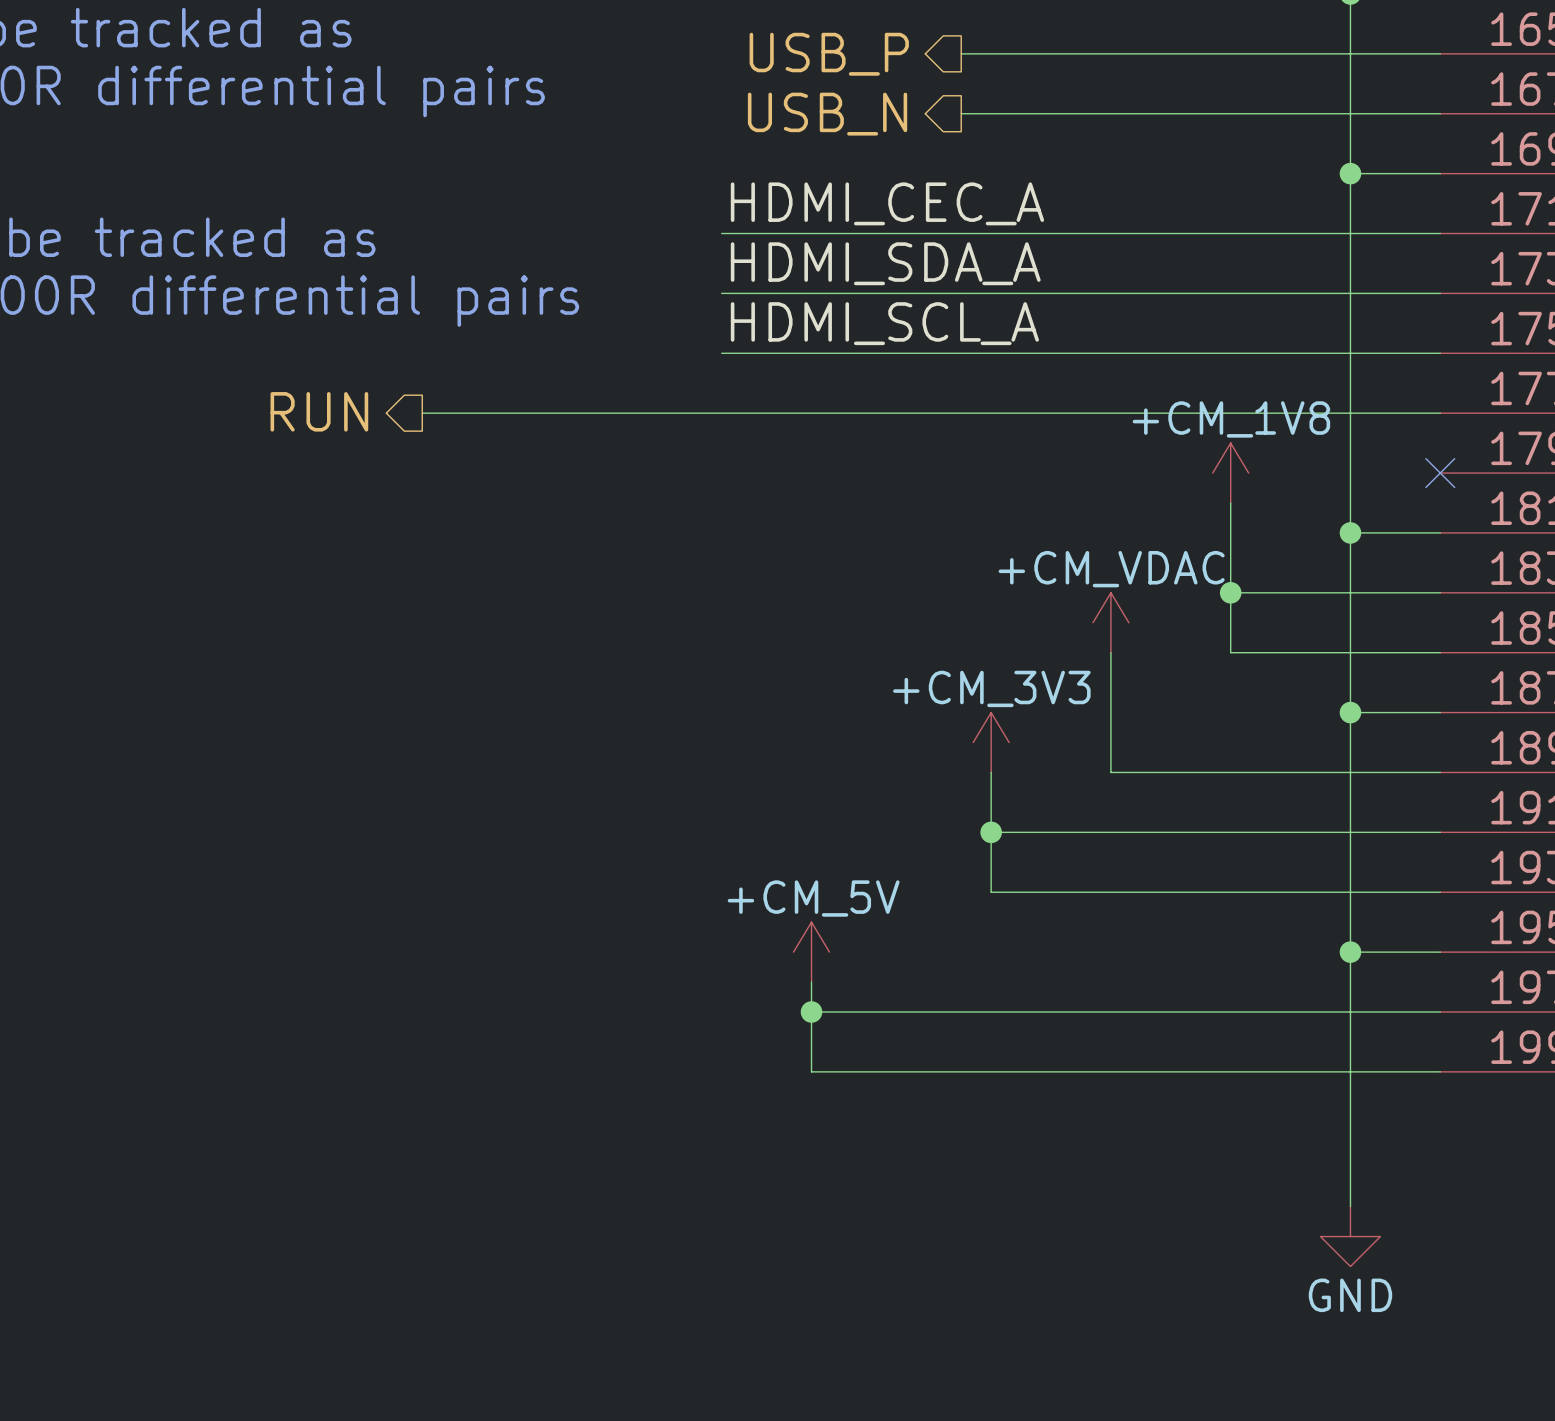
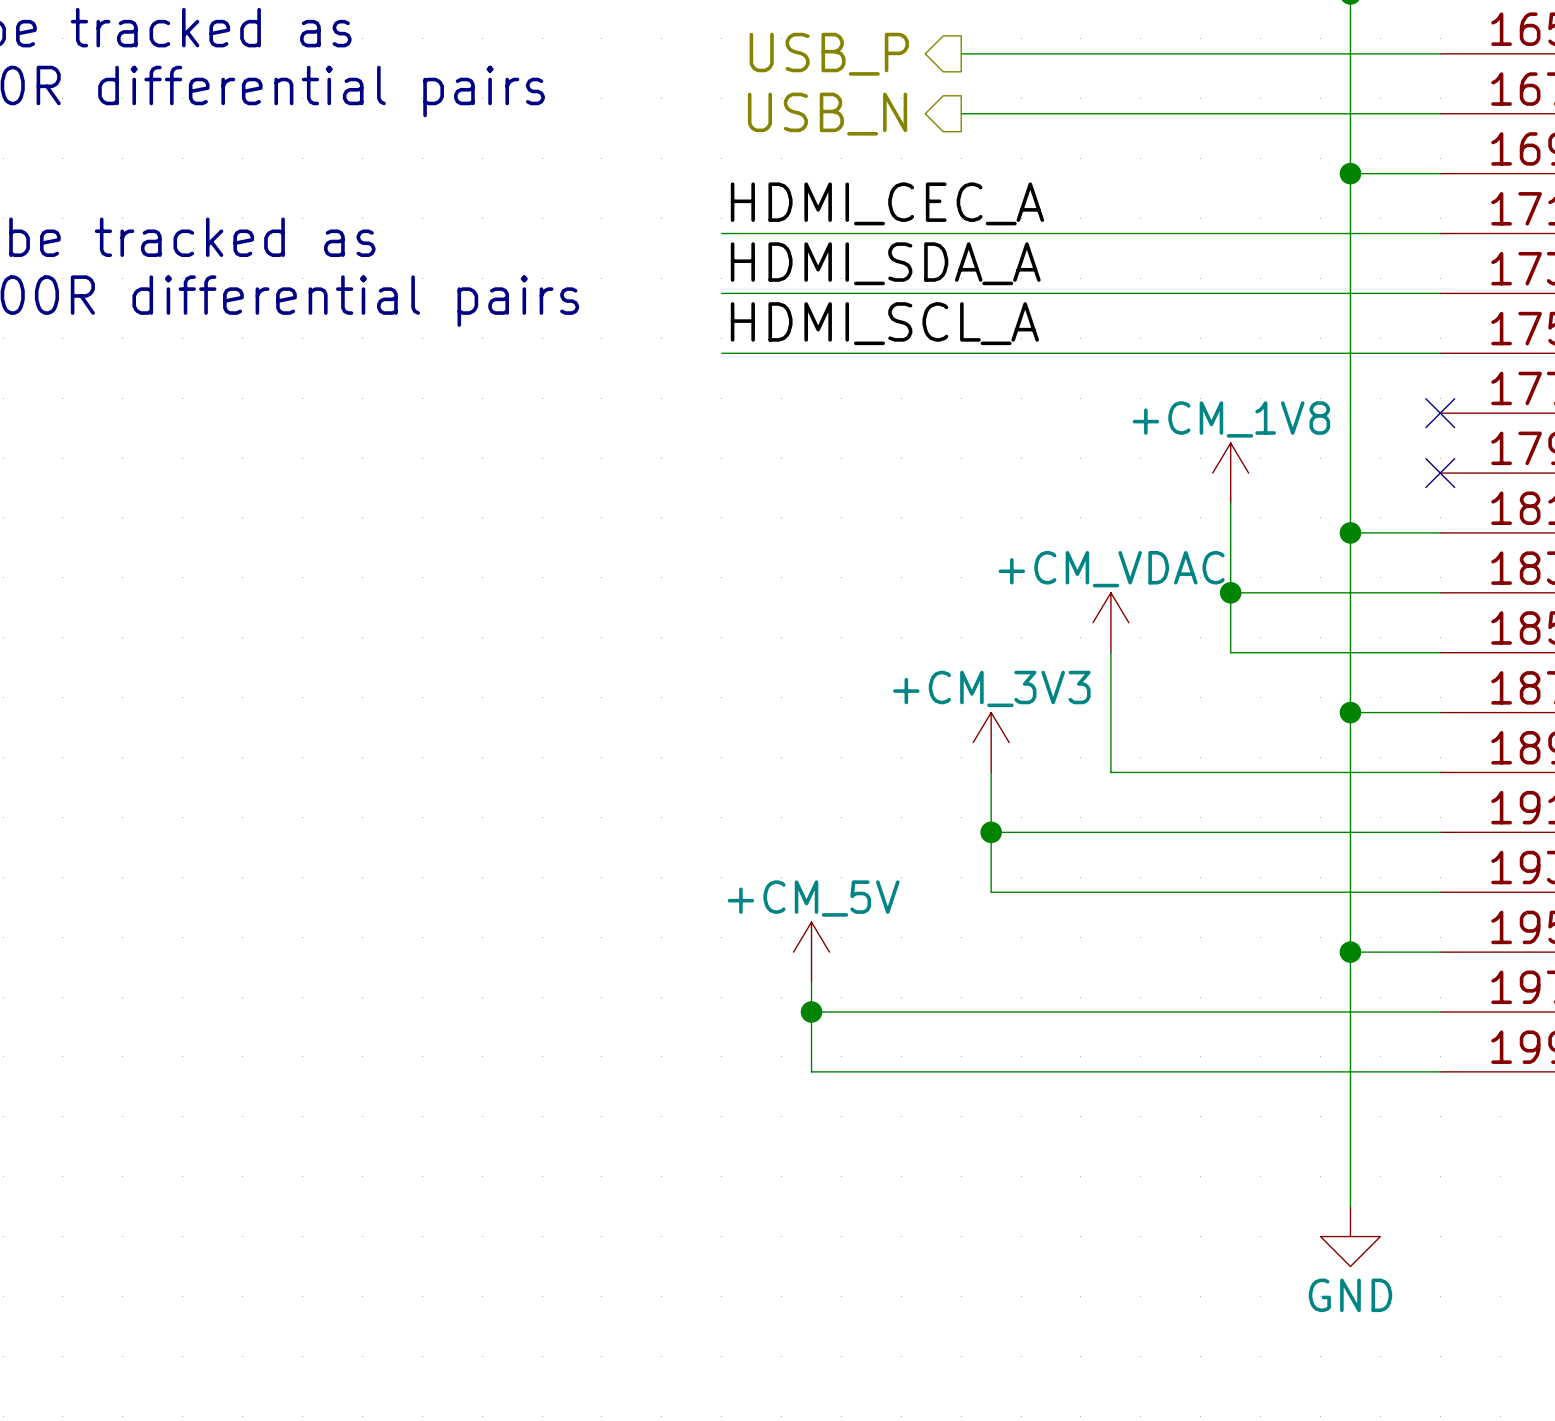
hierarchical label: RUN (319, 411) -> none
wire: (422, 413) (1440, 413) -> none
no-connect mark: none -> (1440, 413)

